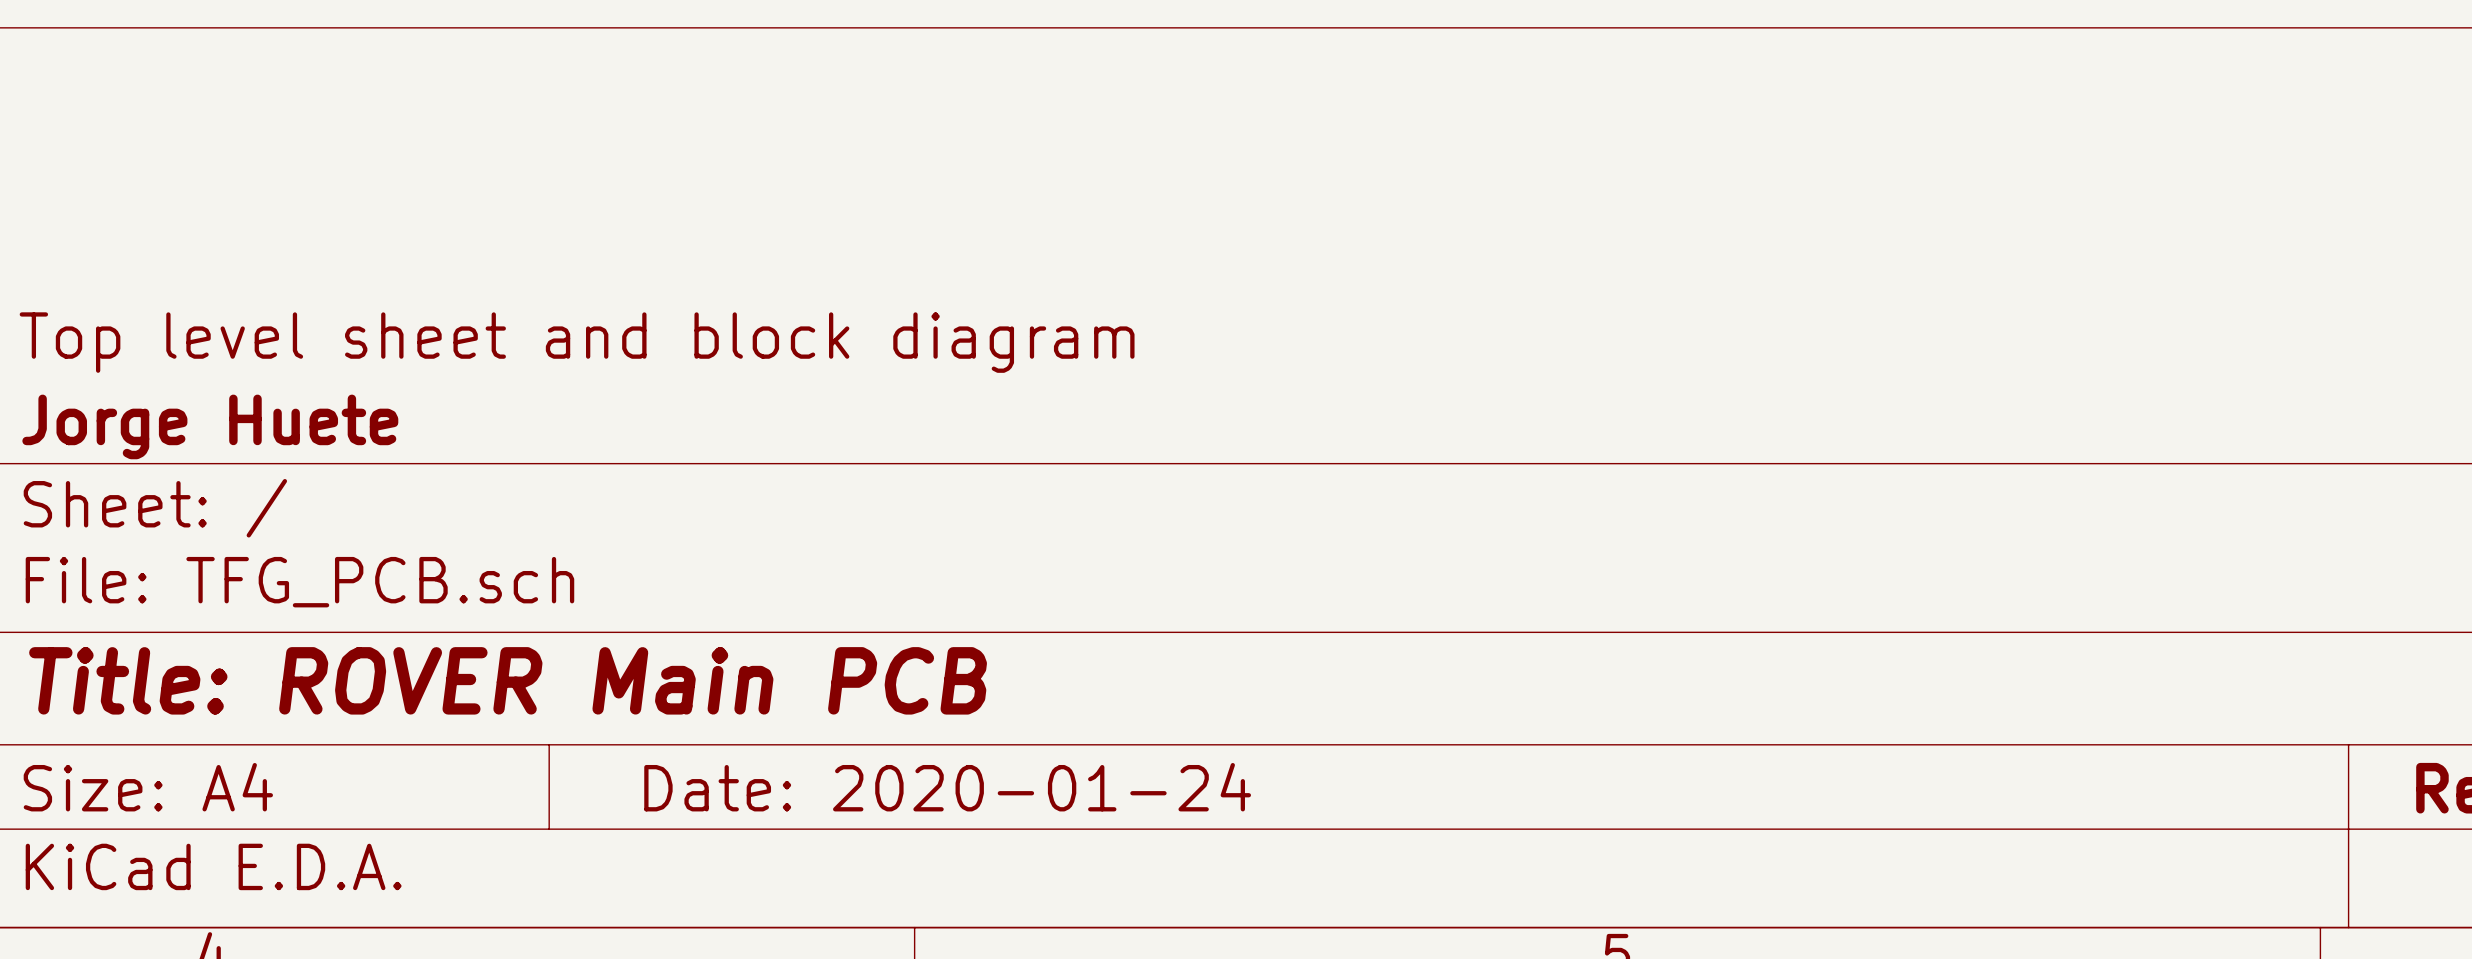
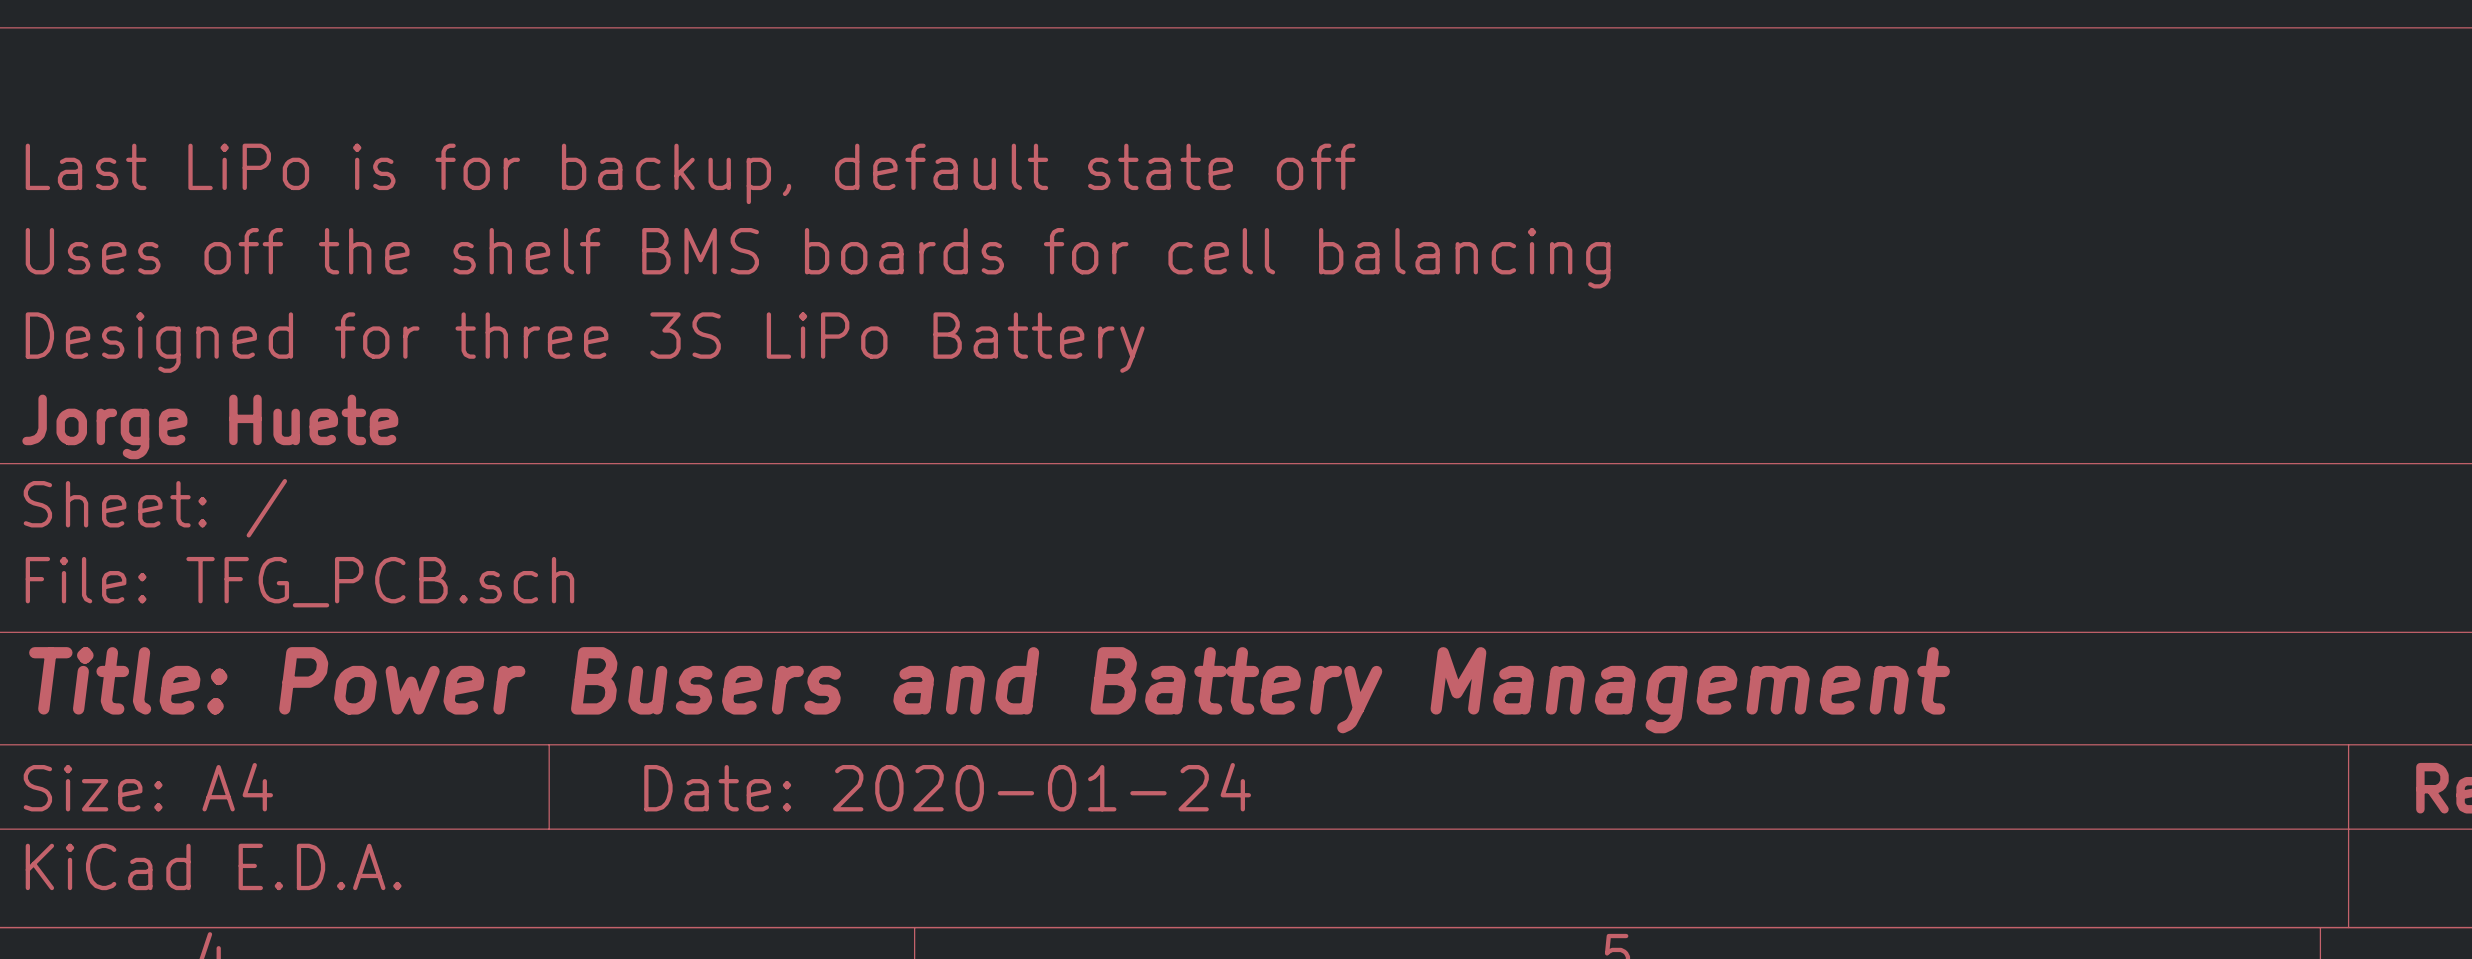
title block: none -> Last LiPo is for backup, default state off (690, 173)
title block: none -> Uses off the shelf BMS boards for cell balancing (818, 258)
title block: Top level sheet and block diagram (577, 342) -> Designed for three 3S LiPo Battery (585, 342)
title block: Title: ROVER Main PCB (508, 680) -> Title: Power Busers and Battery Management (989, 690)

